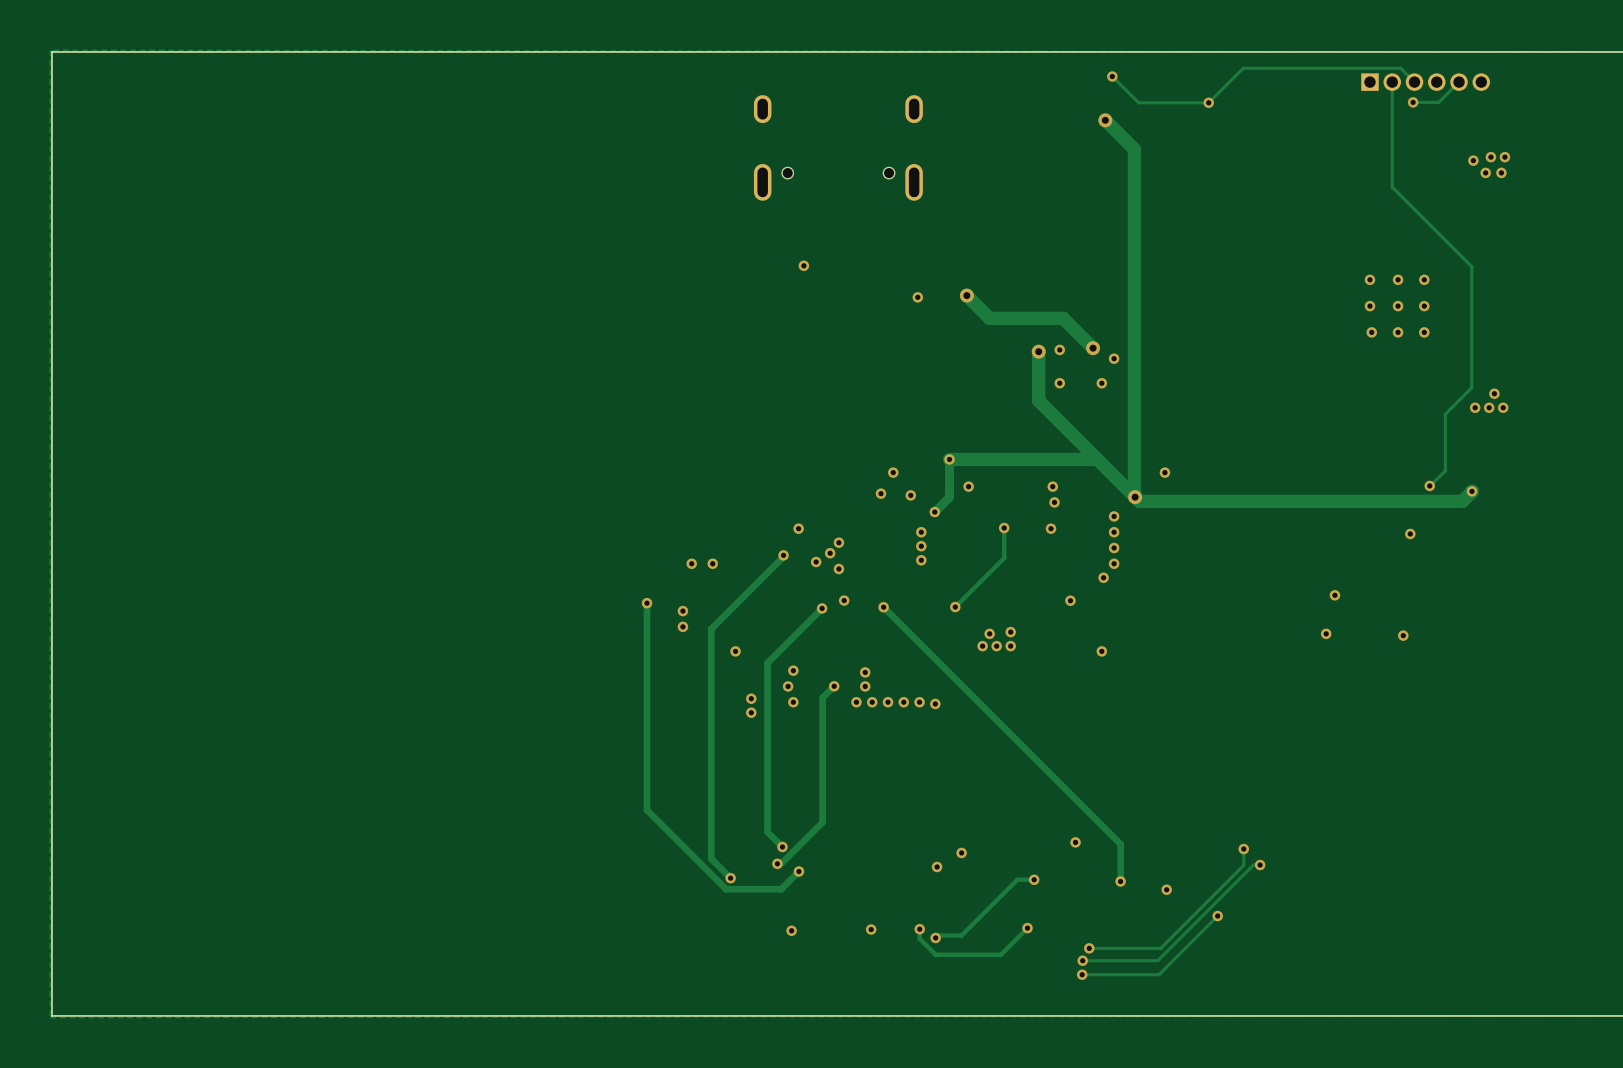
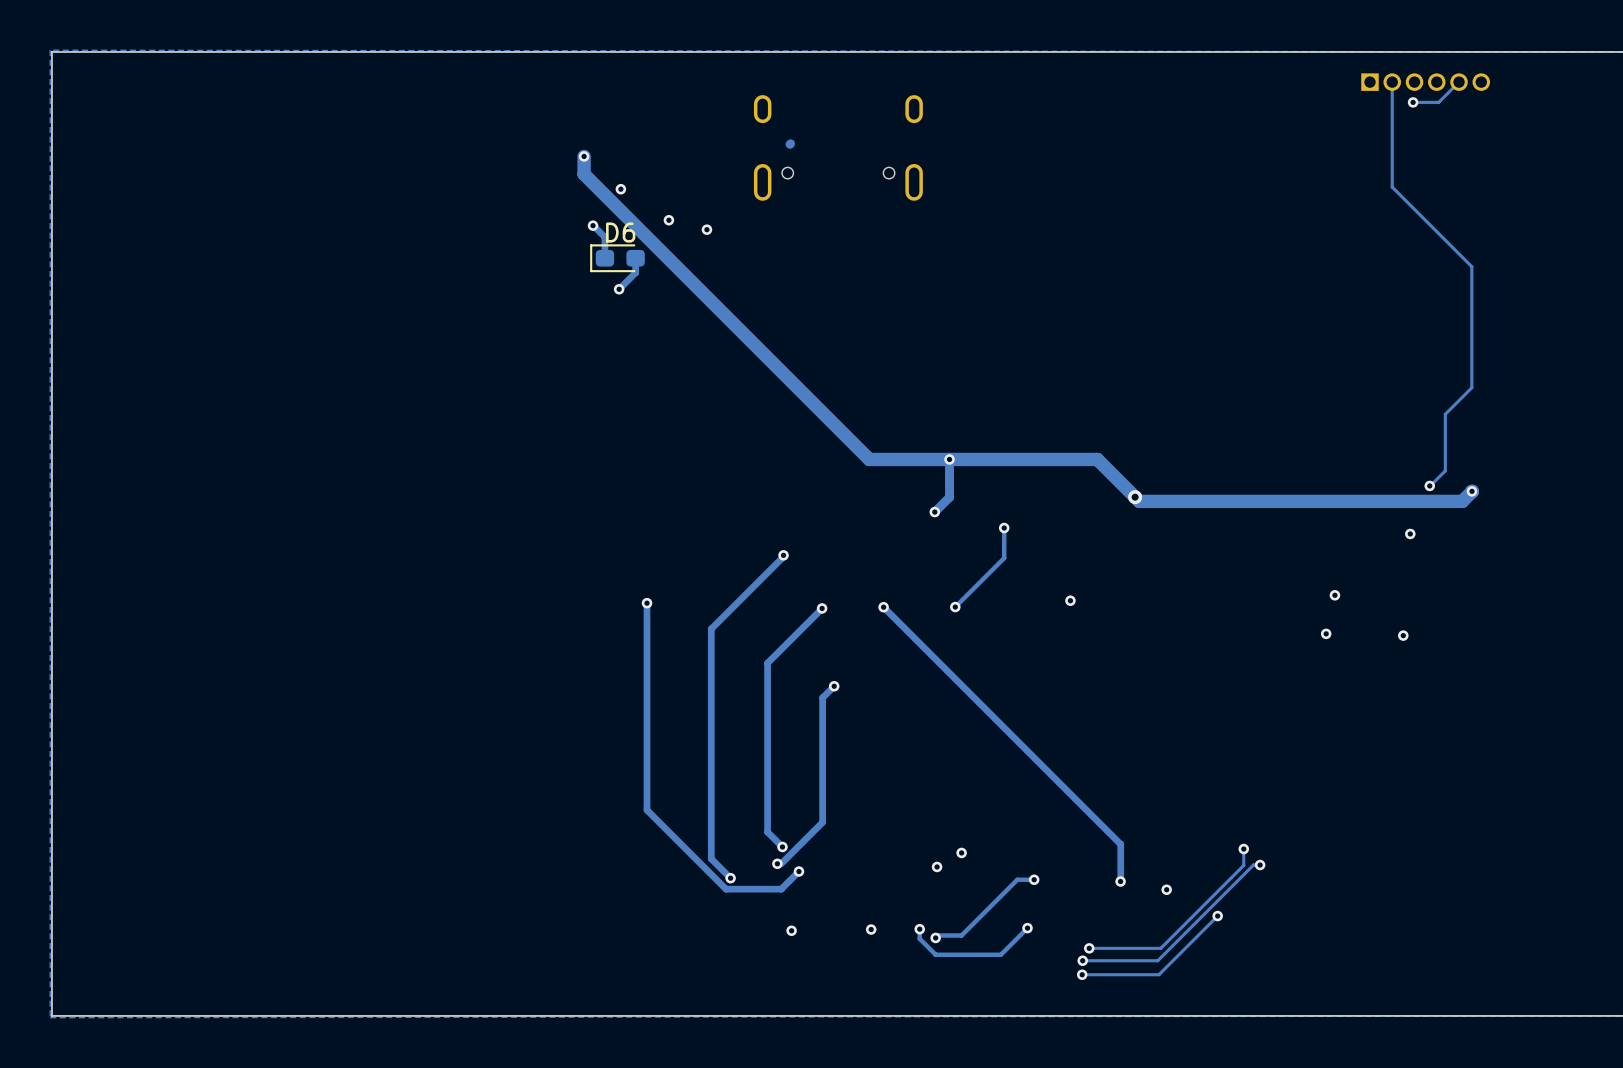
track: (1112, 76) (1138, 102) (1208, 102) (1243, 68) (1400, 68) (1414, 82) -> none
via: (1112, 76) -> none
via: (1208, 102) -> none
track: (1105, 120) (1134, 149) (1134, 496) -> none
via: (1105, 120) -> none
track: none -> (790, 143) (790, 144)
track: none -> (584, 156) (584, 174) (869, 459) (949, 459)
via: none -> (584, 156)
via: (1490, 157) -> none
via: (1504, 157) -> none
via: (1473, 160) -> none
via: (1485, 172) -> none
via: (1501, 172) -> none
via: none -> (620, 189)
via: none -> (668, 220)
track: none -> (593, 225) (604, 237) (604, 258)
via: none -> (593, 225)
via: none -> (706, 229)
D6: none -> (617, 258)
track: none -> (635, 258) (635, 272) (619, 289)
via: (803, 265) -> none
via: (1369, 279) -> none
via: (1398, 279) -> none
via: (1424, 279) -> none
via: none -> (619, 289)
track: (966, 295) (989, 318) (1063, 318) (1093, 348) -> none
via: (966, 295) -> none
via: (917, 297) -> none
via: (1369, 306) -> none
via: (1398, 306) -> none
via: (1424, 306) -> none
via: (1371, 332) -> none
via: (1398, 332) -> none
via: (1424, 332) -> none
via: (1093, 348) -> none
via: (1059, 349) -> none
track: (1038, 351) (1038, 400) (1097, 459) -> none
via: (1038, 351) -> none
via: (1114, 358) -> none
via: (1059, 383) -> none
via: (1101, 383) -> none
via: (1494, 393) -> none
via: (1475, 407) -> none
via: (1489, 407) -> none
via: (1503, 407) -> none
via: (893, 472) -> none
via: (1164, 472) -> none
via: (968, 486) -> none
via: (1052, 486) -> none
via: (880, 493) -> none
via: (910, 495) -> none
via: (1054, 502) -> none
via: (1114, 516) -> none
via: (798, 528) -> none
via: (1051, 528) -> none
via: (921, 532) -> none
via: (1114, 532) -> none
via: (838, 542) -> none
via: (921, 546) -> none
via: (1114, 547) -> none
via: (830, 553) -> none
via: (921, 560) -> none
via: (816, 562) -> none
via: (691, 563) -> none
via: (712, 563) -> none
via: (1114, 563) -> none
via: (838, 569) -> none
via: (1103, 577) -> none
via: (844, 600) -> none
via: (682, 611) -> none
via: (682, 626) -> none
via: (1010, 632) -> none
via: (989, 633) -> none
via: (982, 646) -> none
via: (996, 646) -> none
via: (1010, 646) -> none
via: (735, 651) -> none
via: (1101, 651) -> none
via: (793, 670) -> none
via: (865, 672) -> none
via: (788, 686) -> none
via: (865, 686) -> none
via: (751, 698) -> none
via: (793, 702) -> none
via: (856, 702) -> none
via: (872, 702) -> none
via: (888, 702) -> none
via: (903, 702) -> none
via: (919, 702) -> none
via: (935, 703) -> none
via: (751, 712) -> none
via: (1075, 842) -> none

